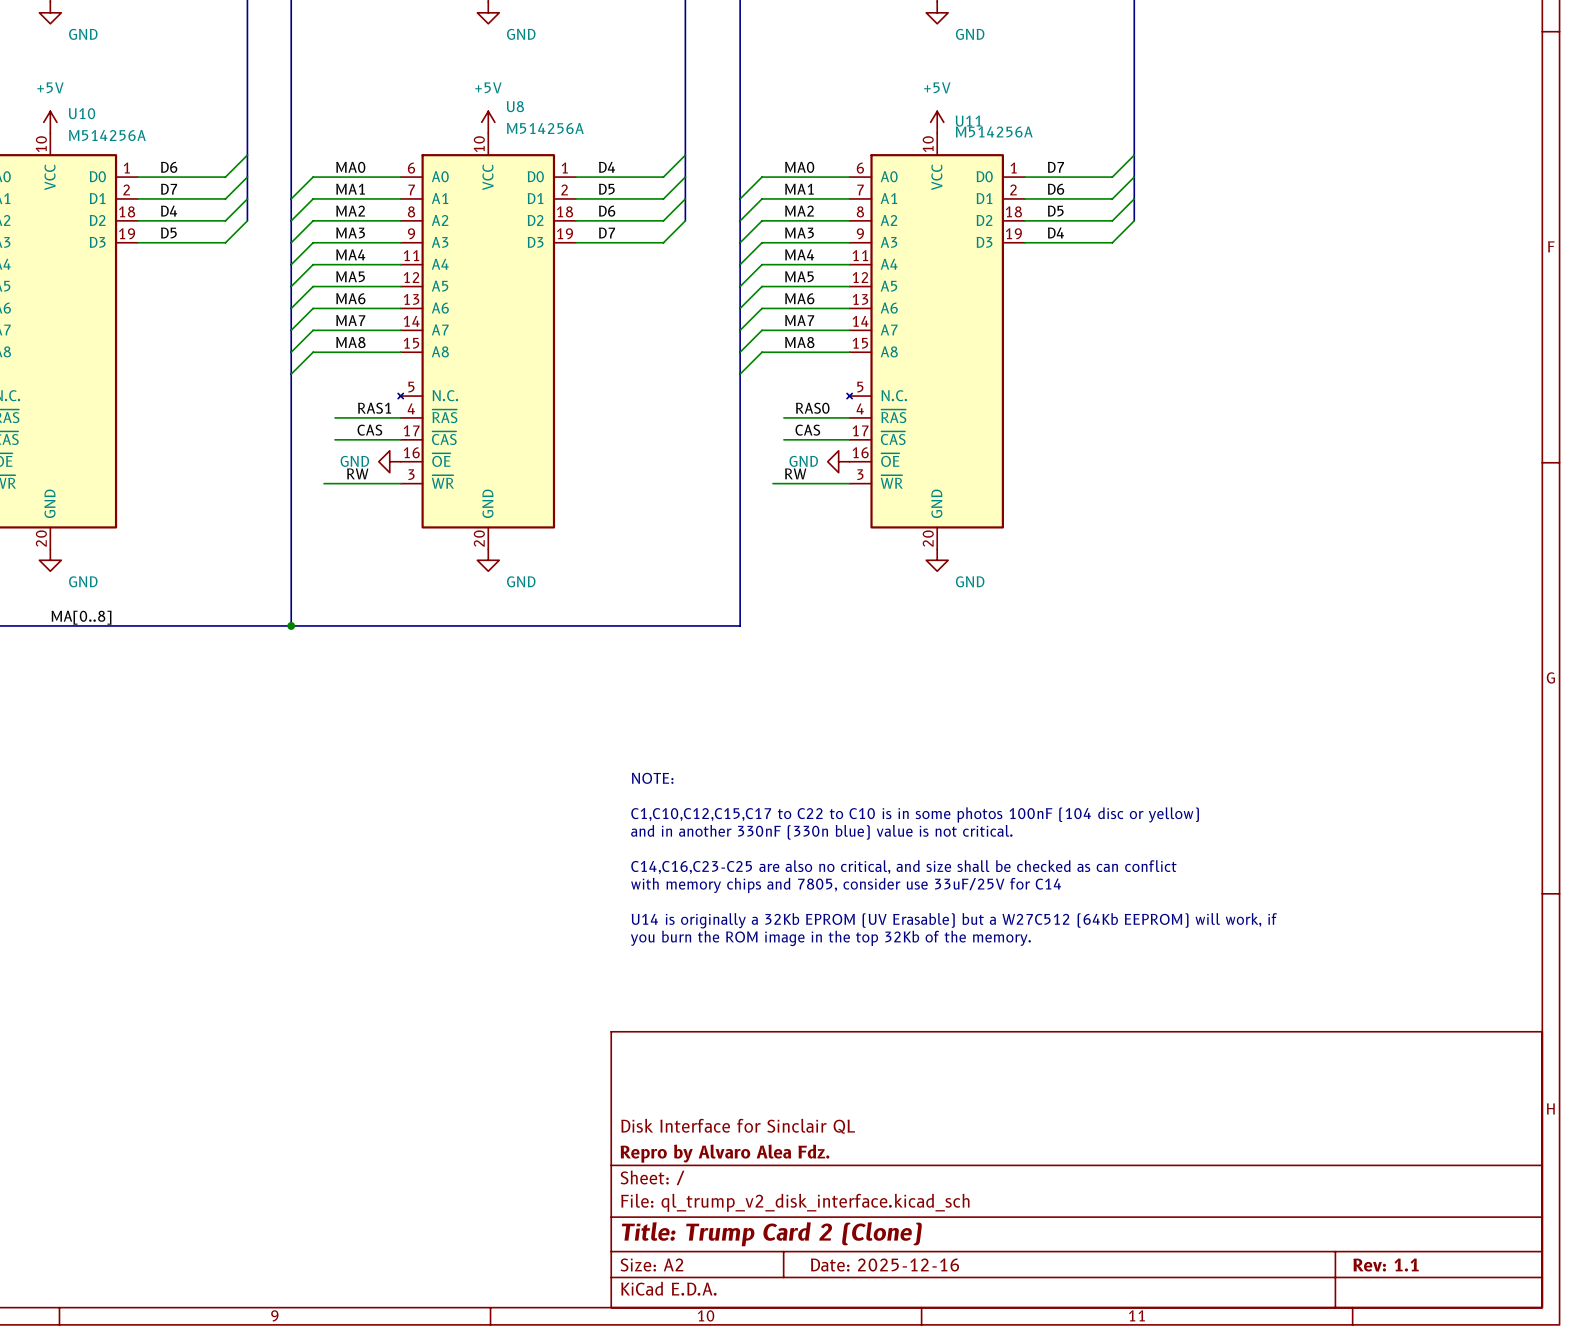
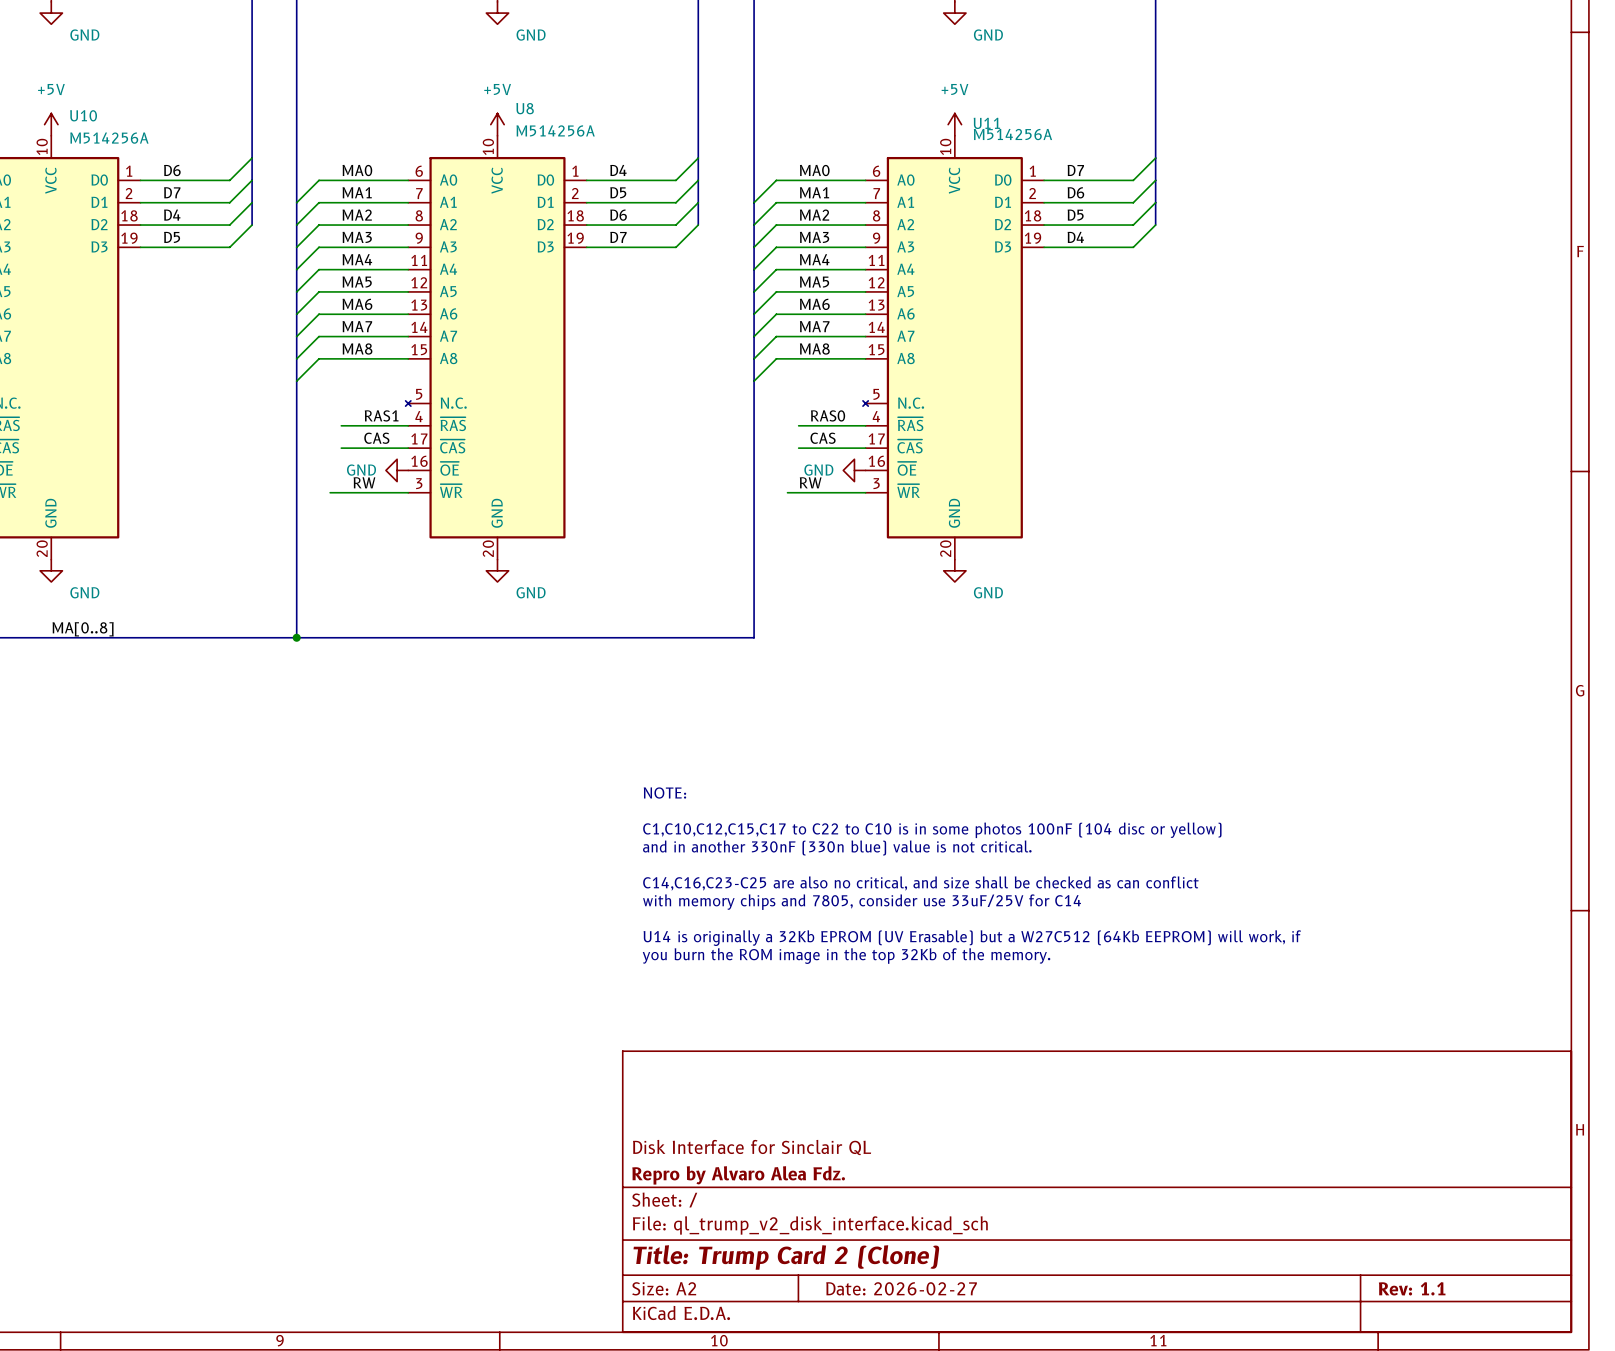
title block: Date: 2025-12-16 (885, 1264) -> Date: 2026-02-27 (901, 1288)

